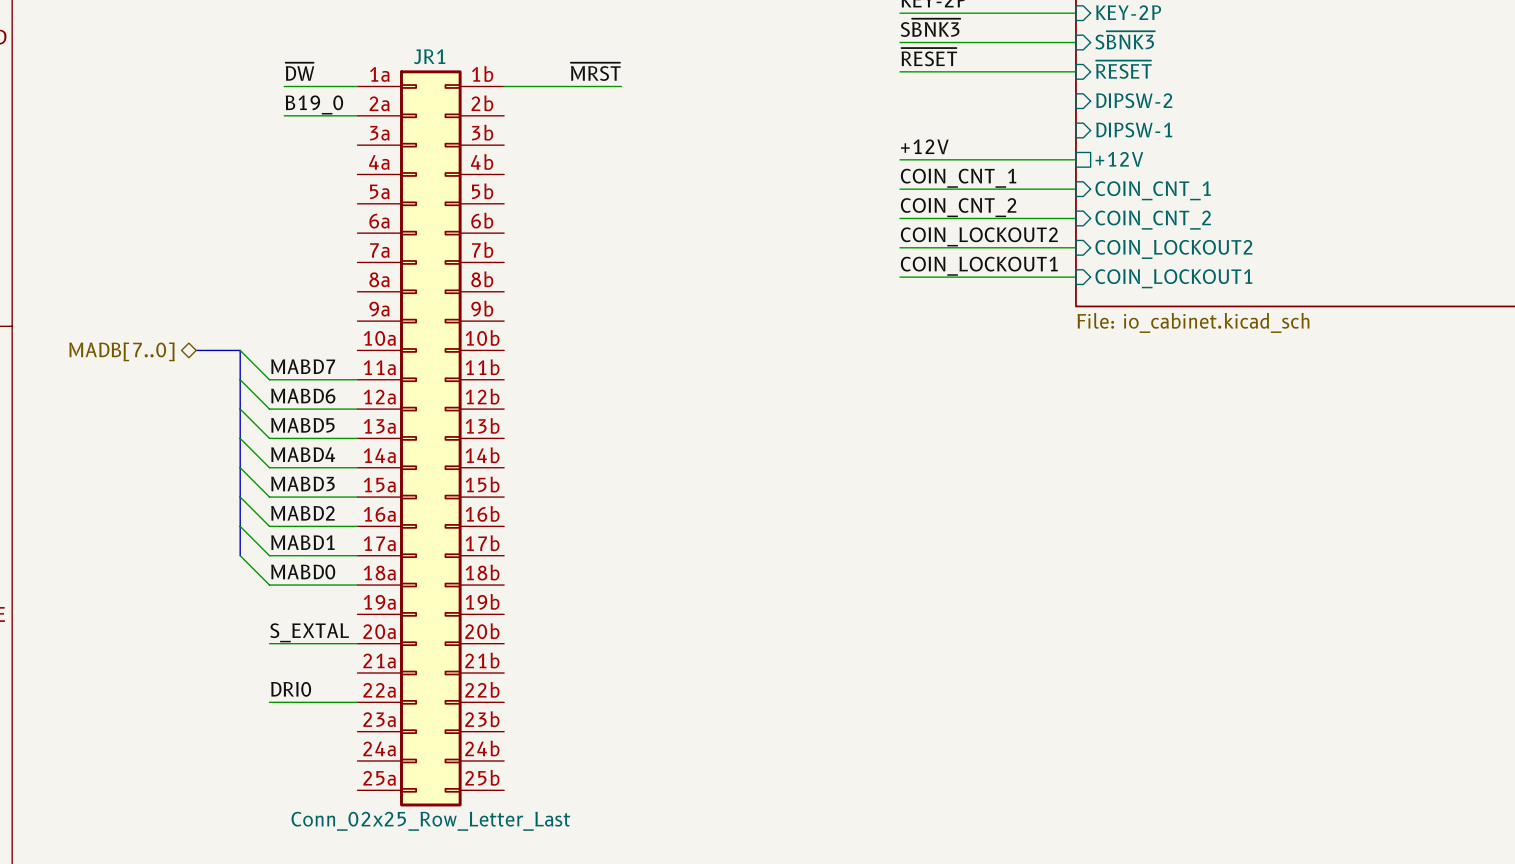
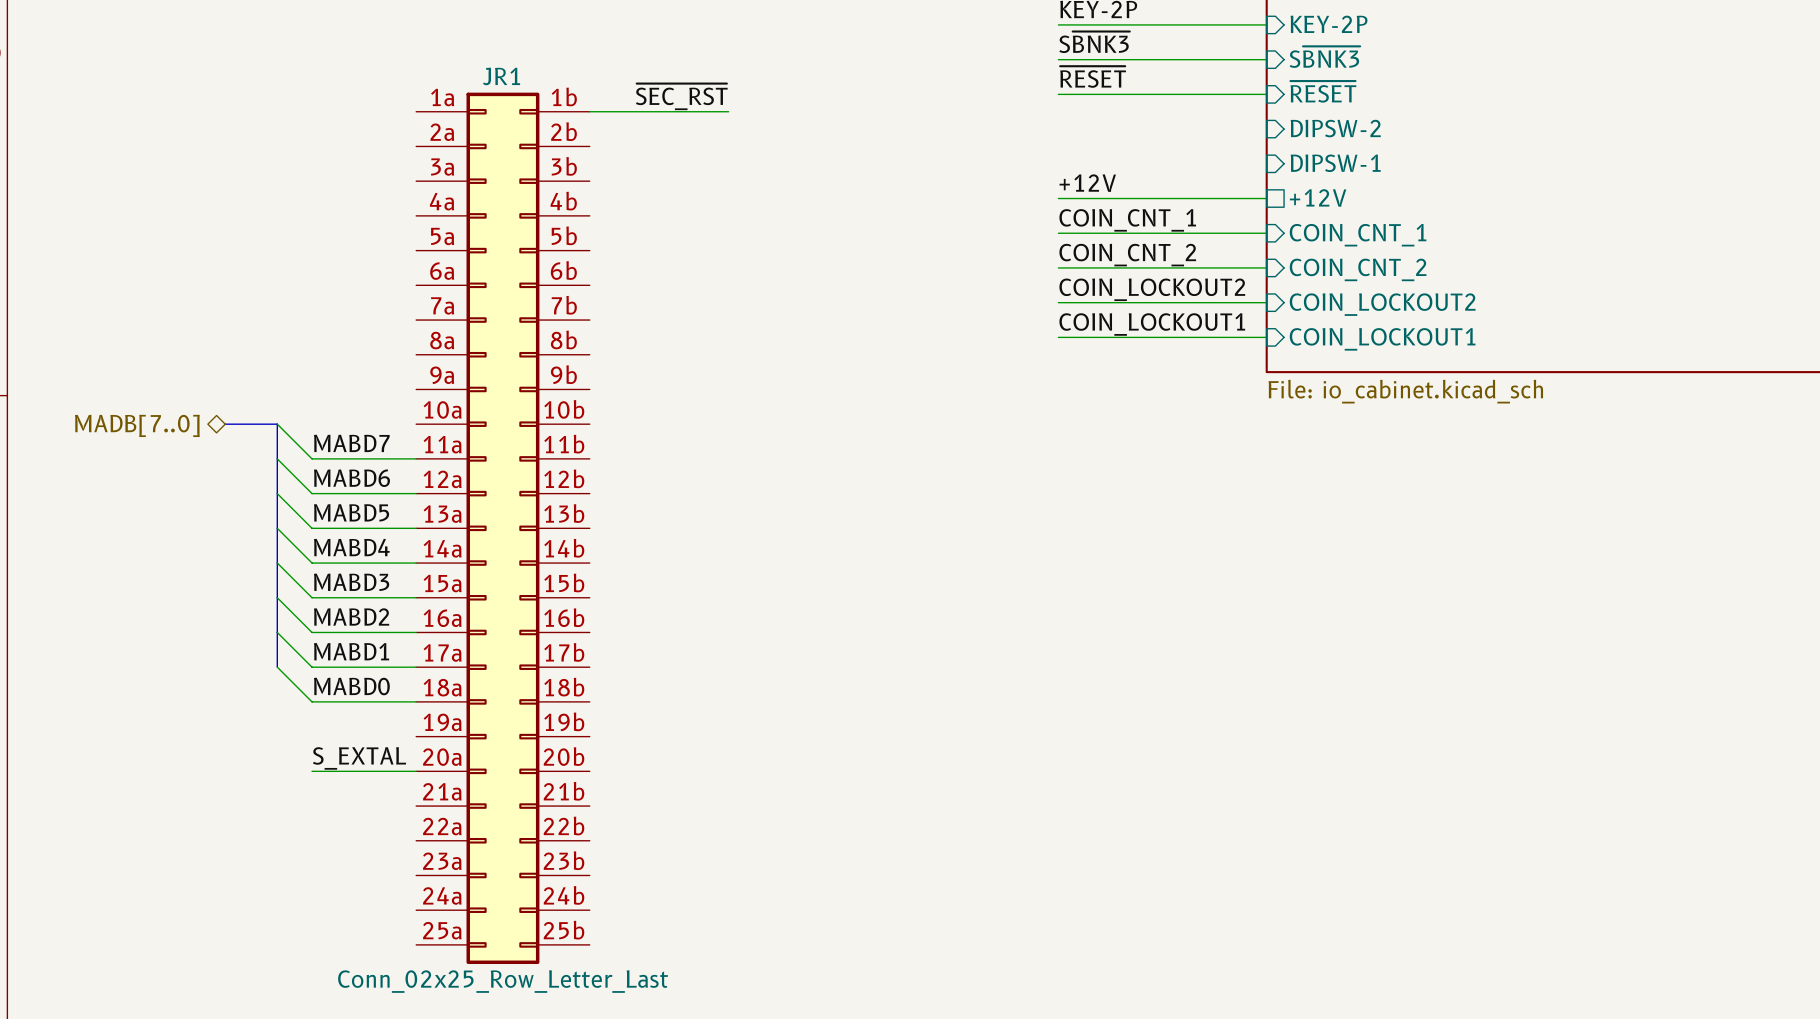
label: ~{DW} (299, 71) -> none
label: ~{MRST} (595, 71) -> ~{SEC_RST} (681, 96)
wire: (284, 86) (357, 86) -> none
label: B19_0 (314, 104) -> none
wire: (284, 115) (357, 115) -> none
label: DRI0 (291, 689) -> none
wire: (269, 702) (357, 702) -> none

